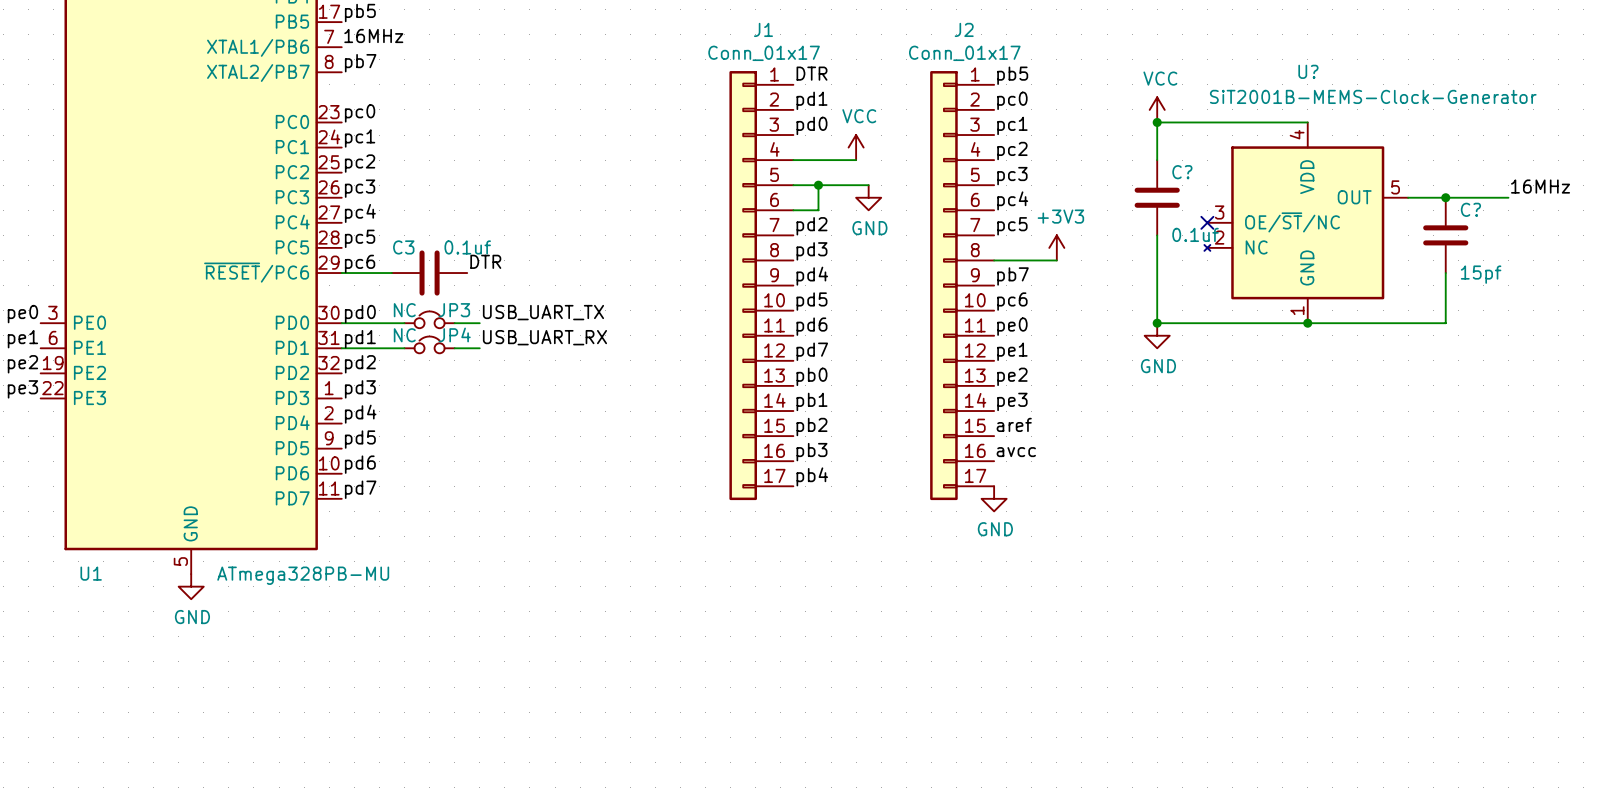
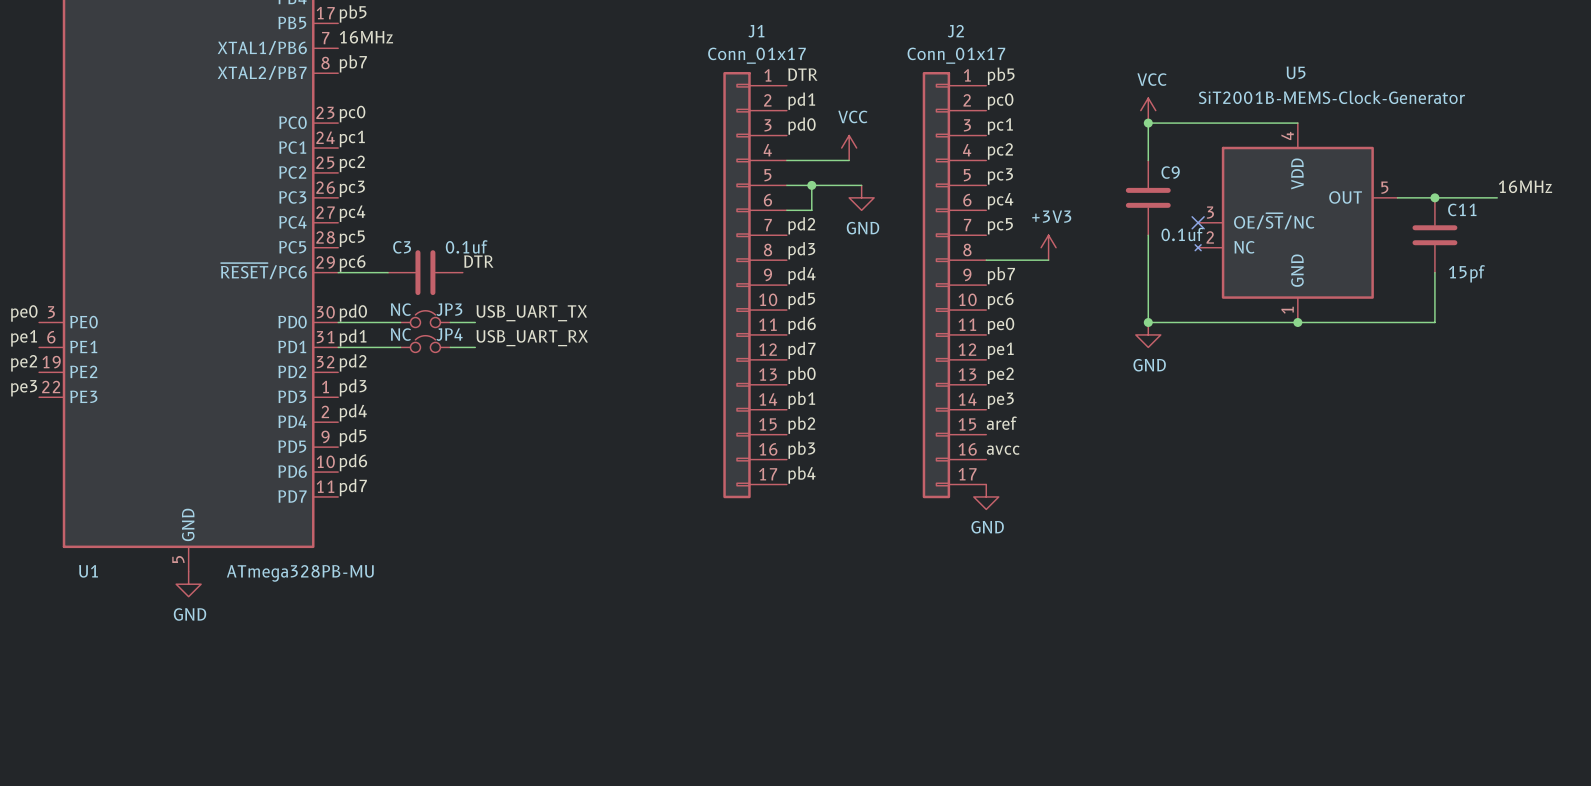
U? name: U? (1308, 71) -> U5 (1296, 72)
C? name: C? (1182, 172) -> C9 (1170, 172)
C? name: C? (1470, 209) -> C11 (1462, 209)

